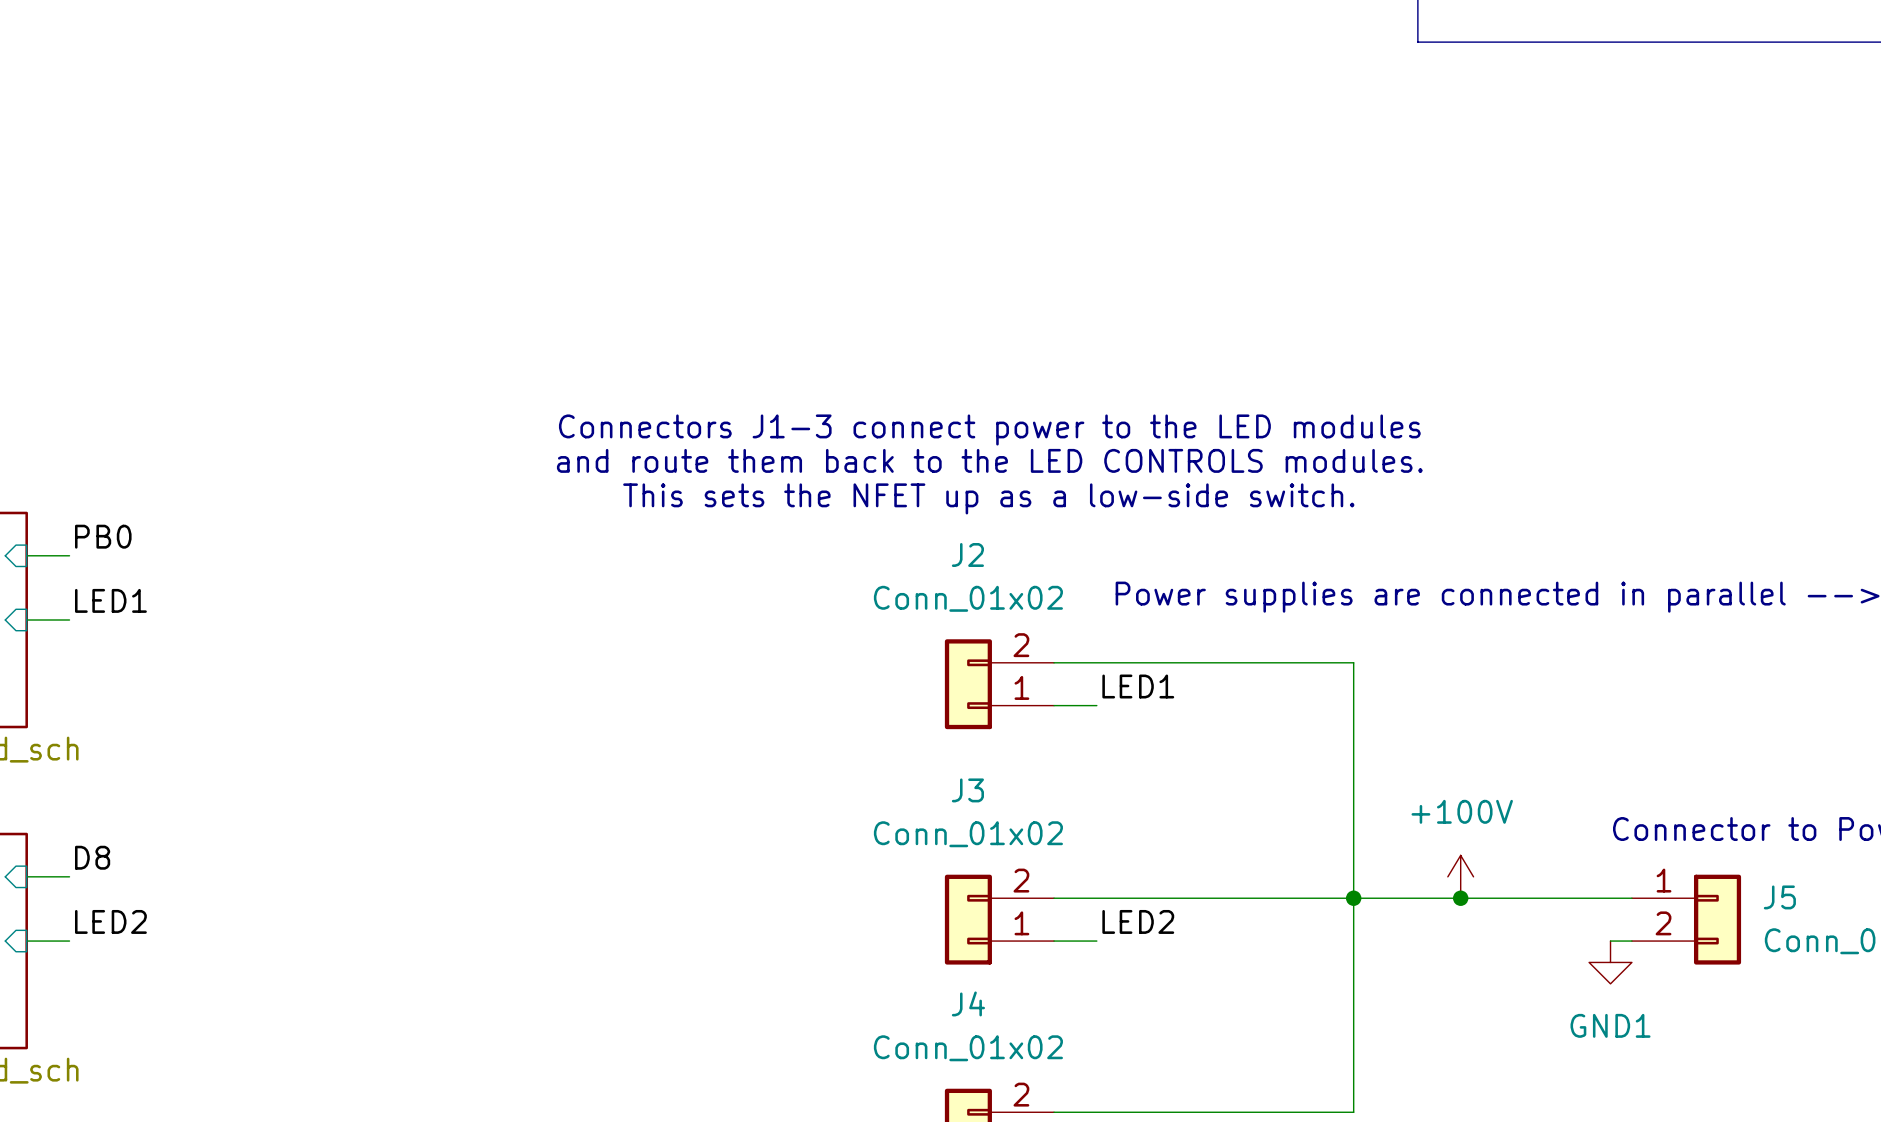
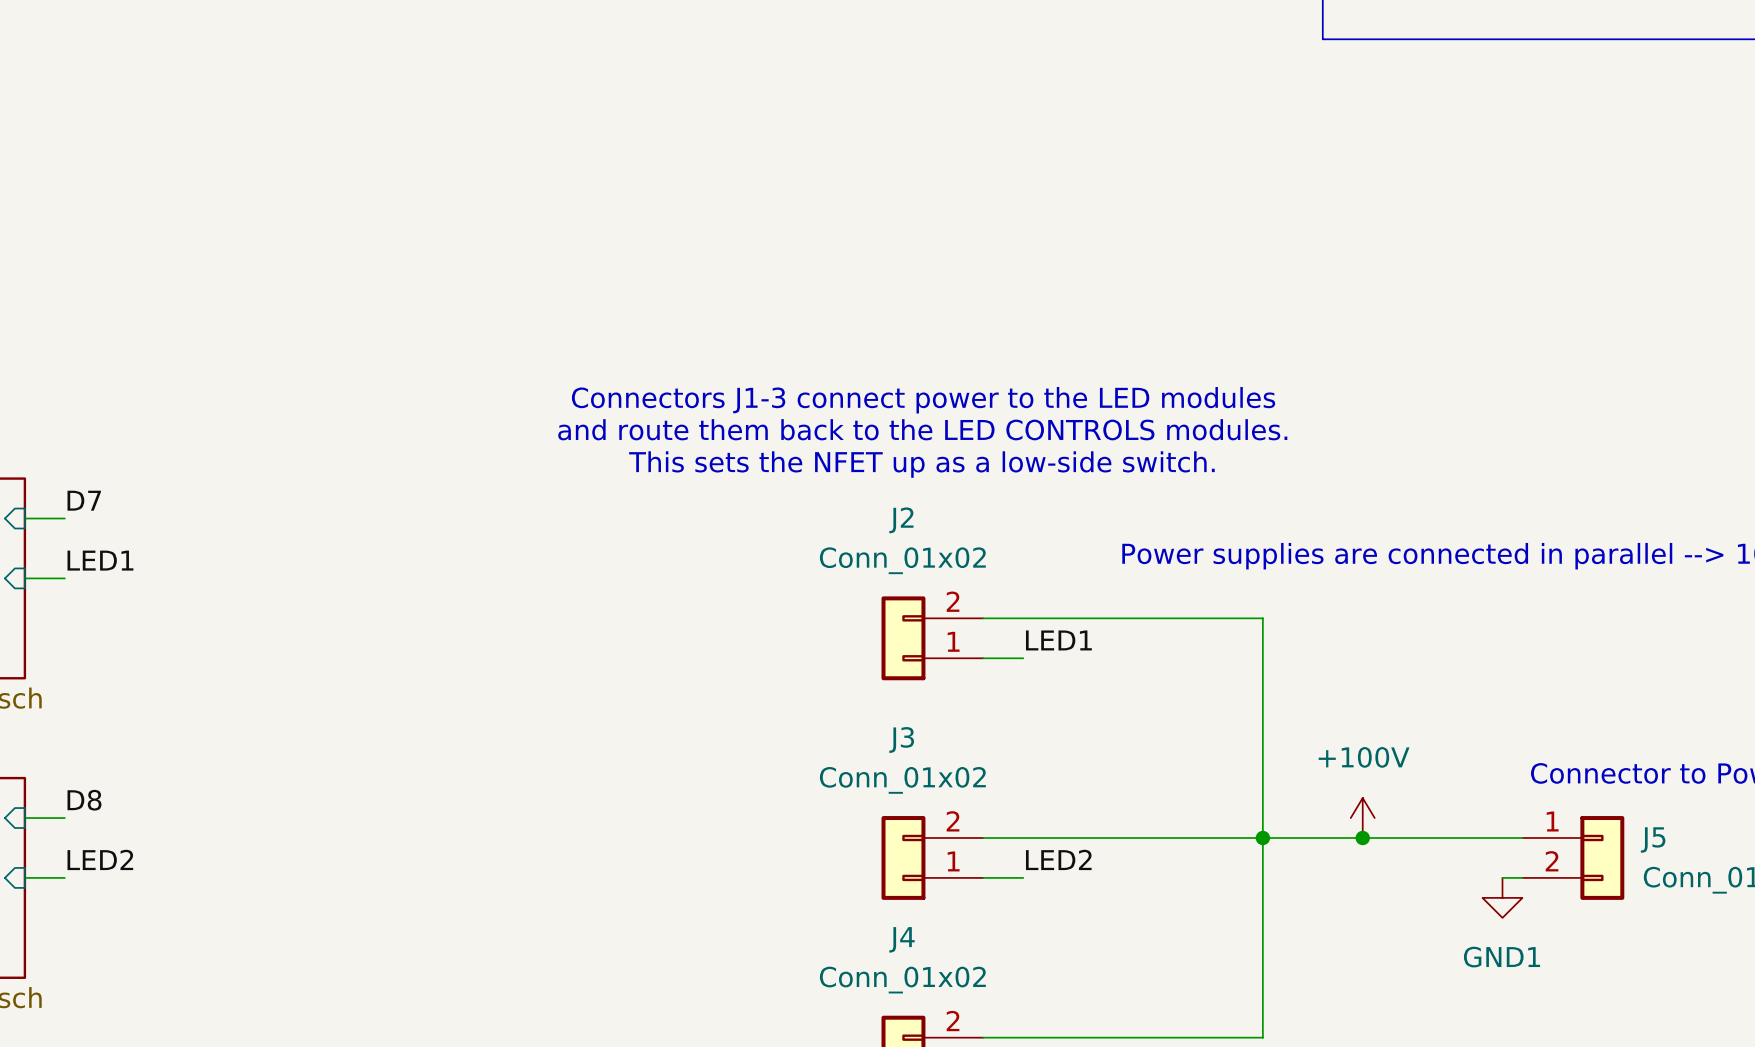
label: PB0 (103, 536) -> D7 (84, 500)

